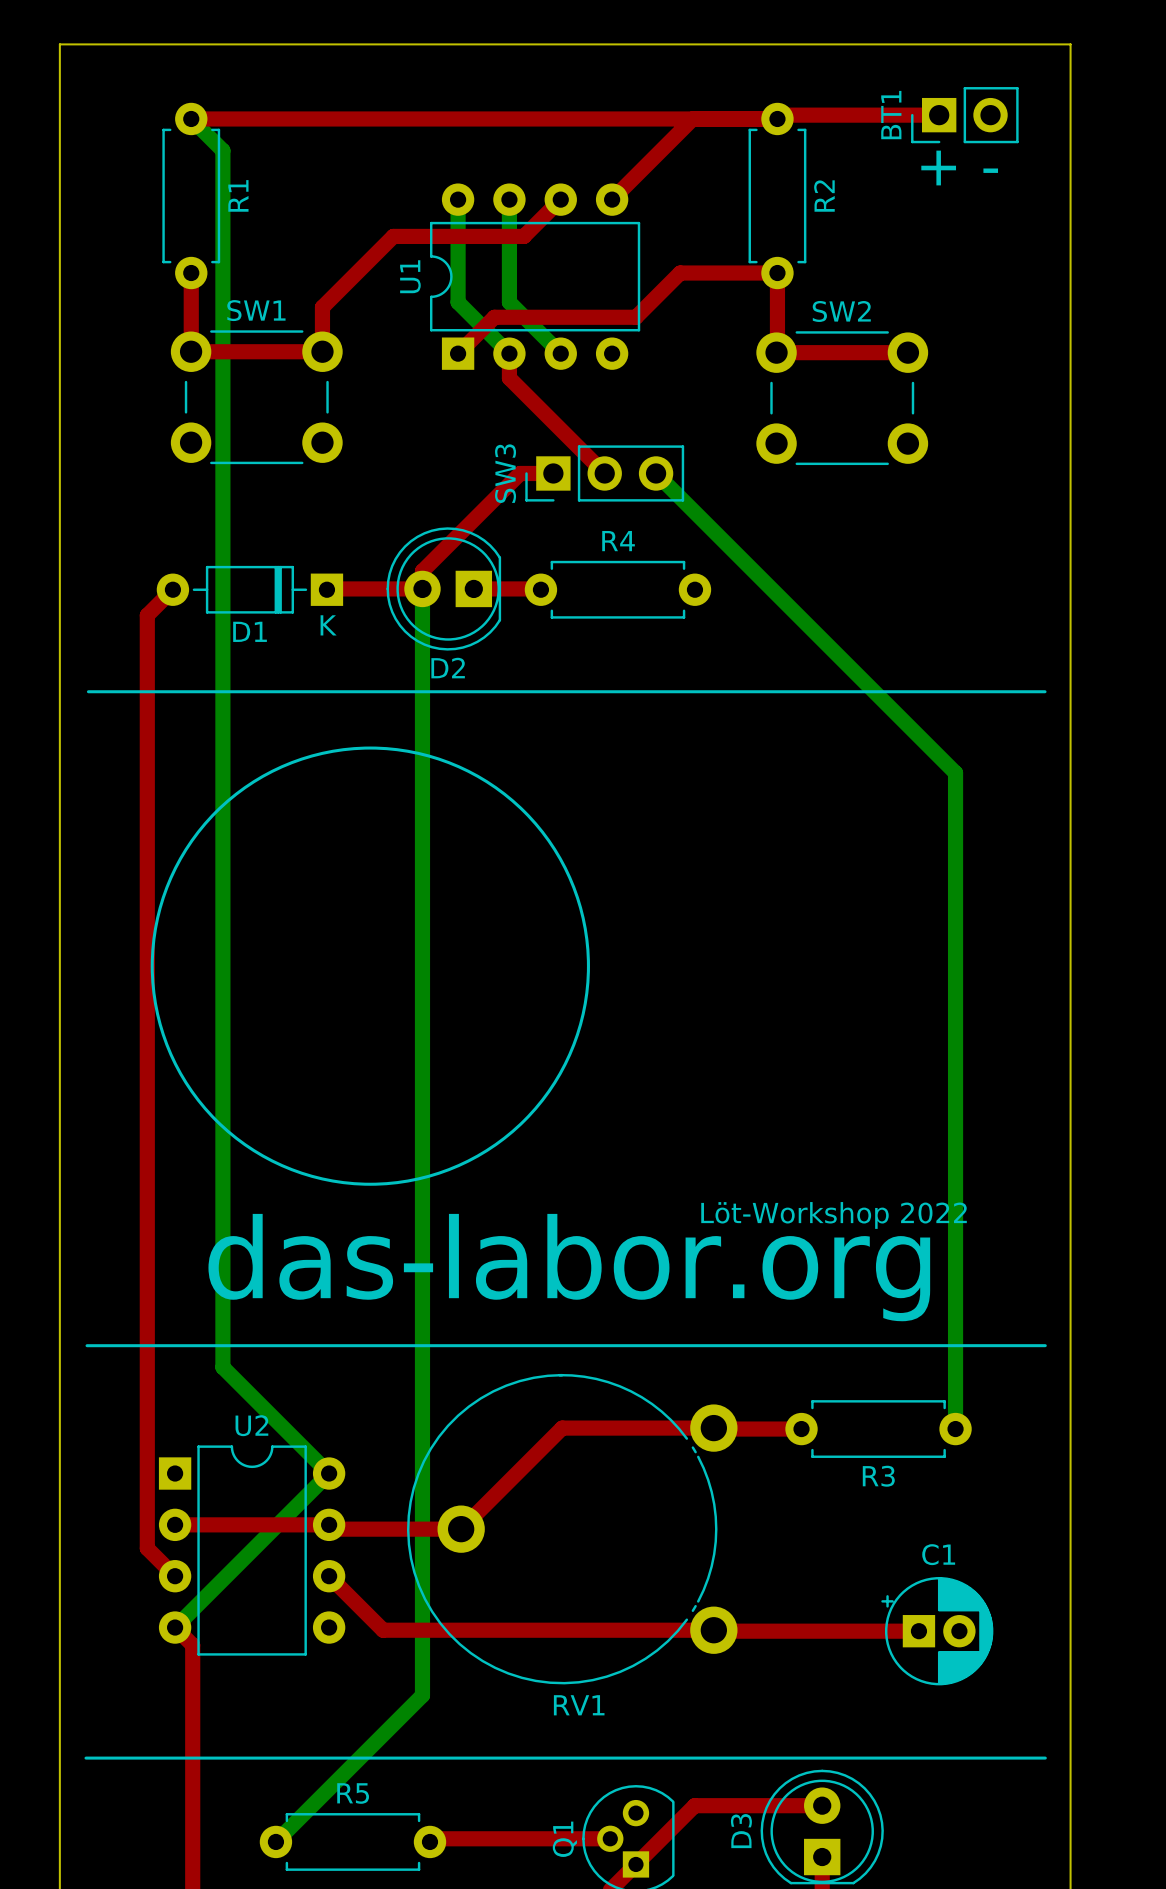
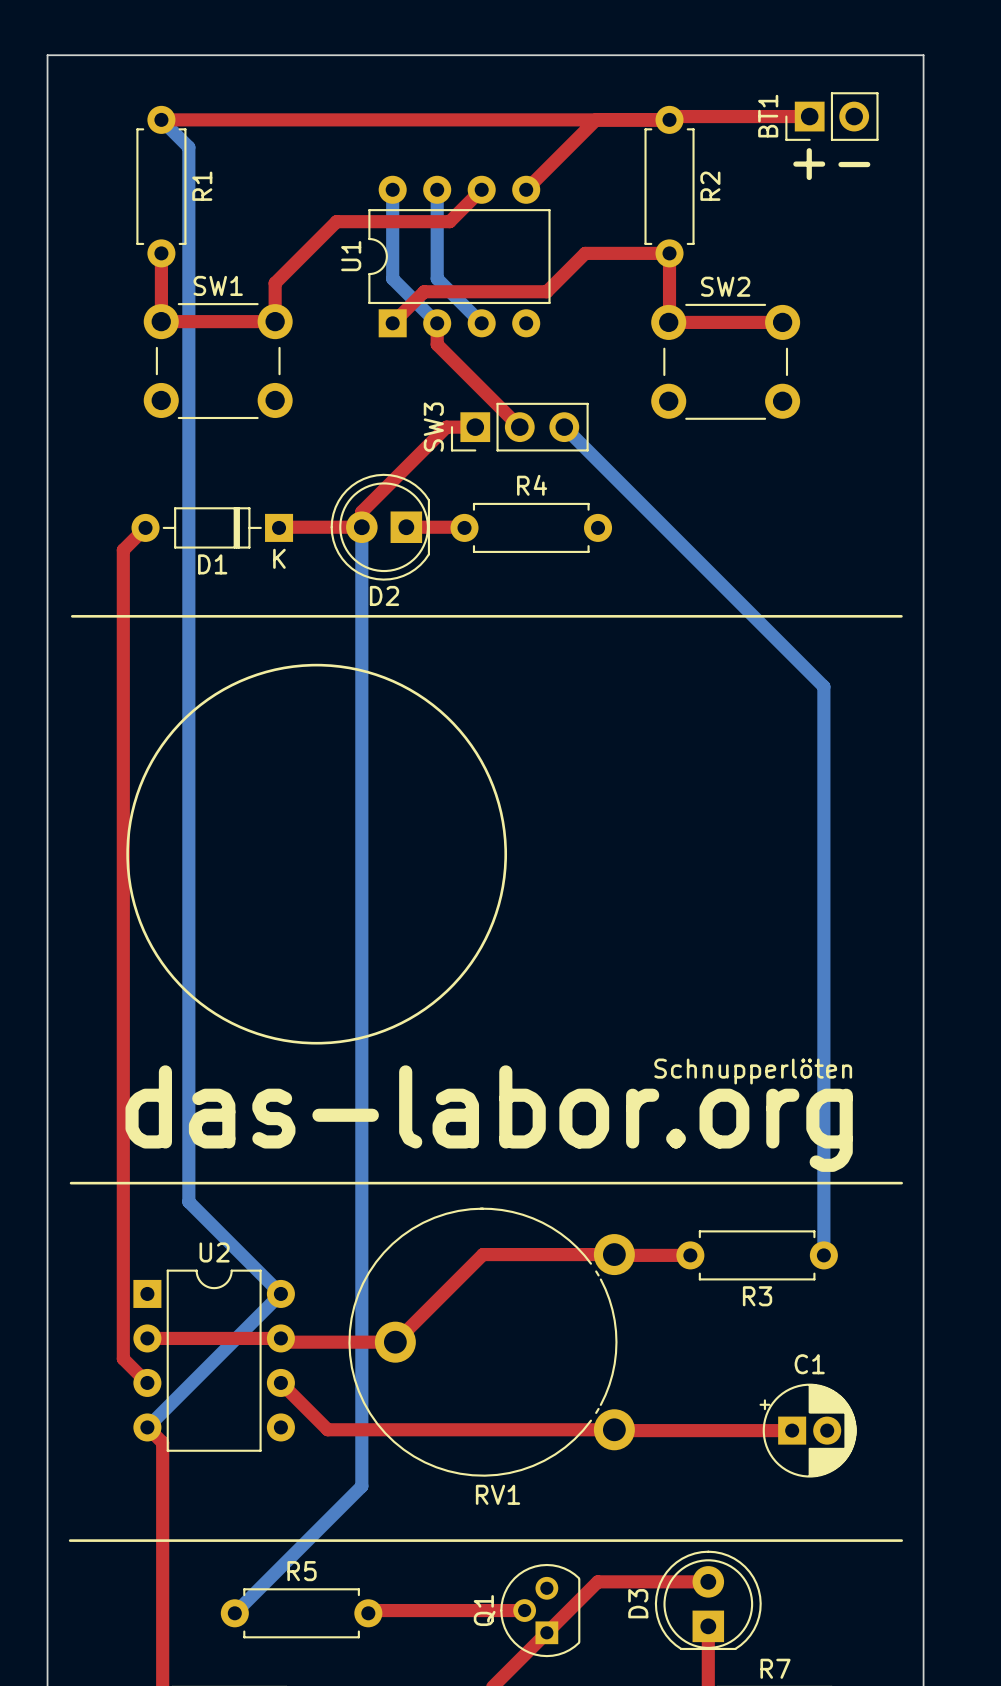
text: Löt-Workshop 2022 (834, 1215) -> none
text: none -> Schnupperlöten (753, 1071)

